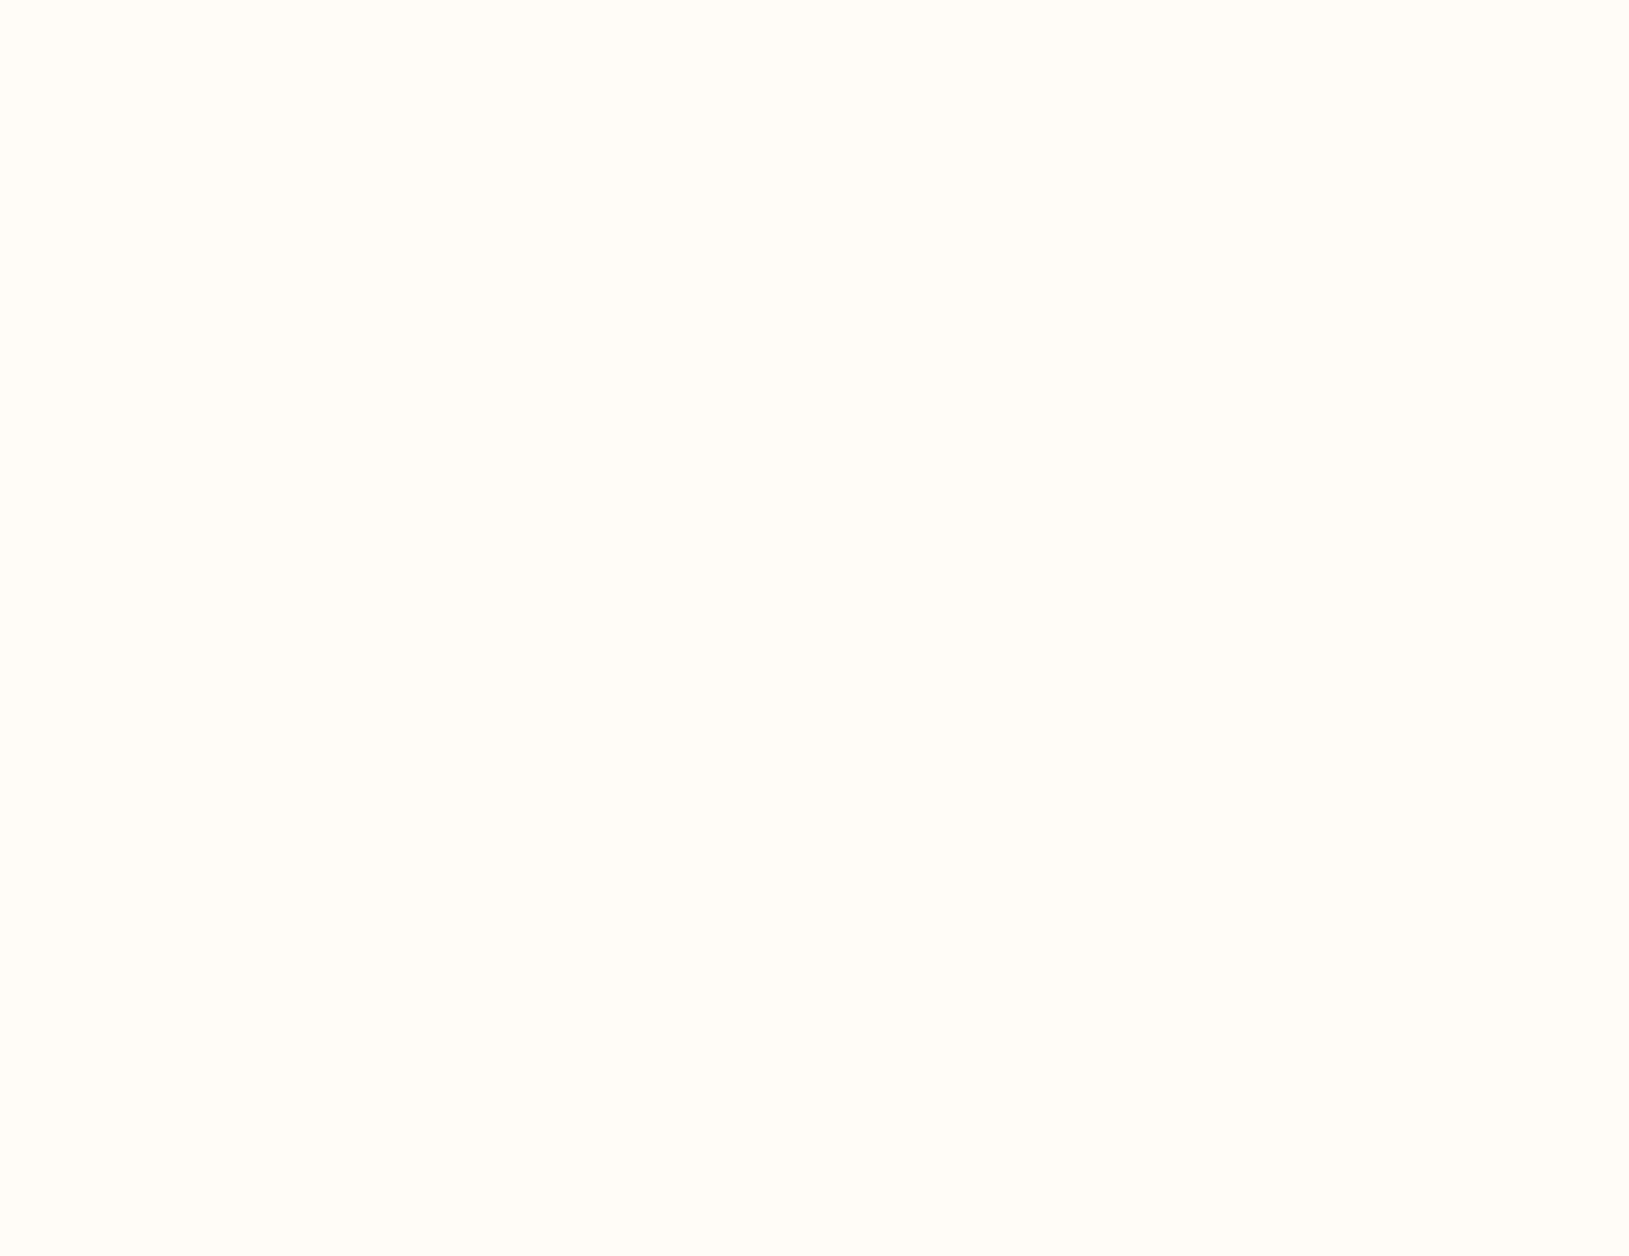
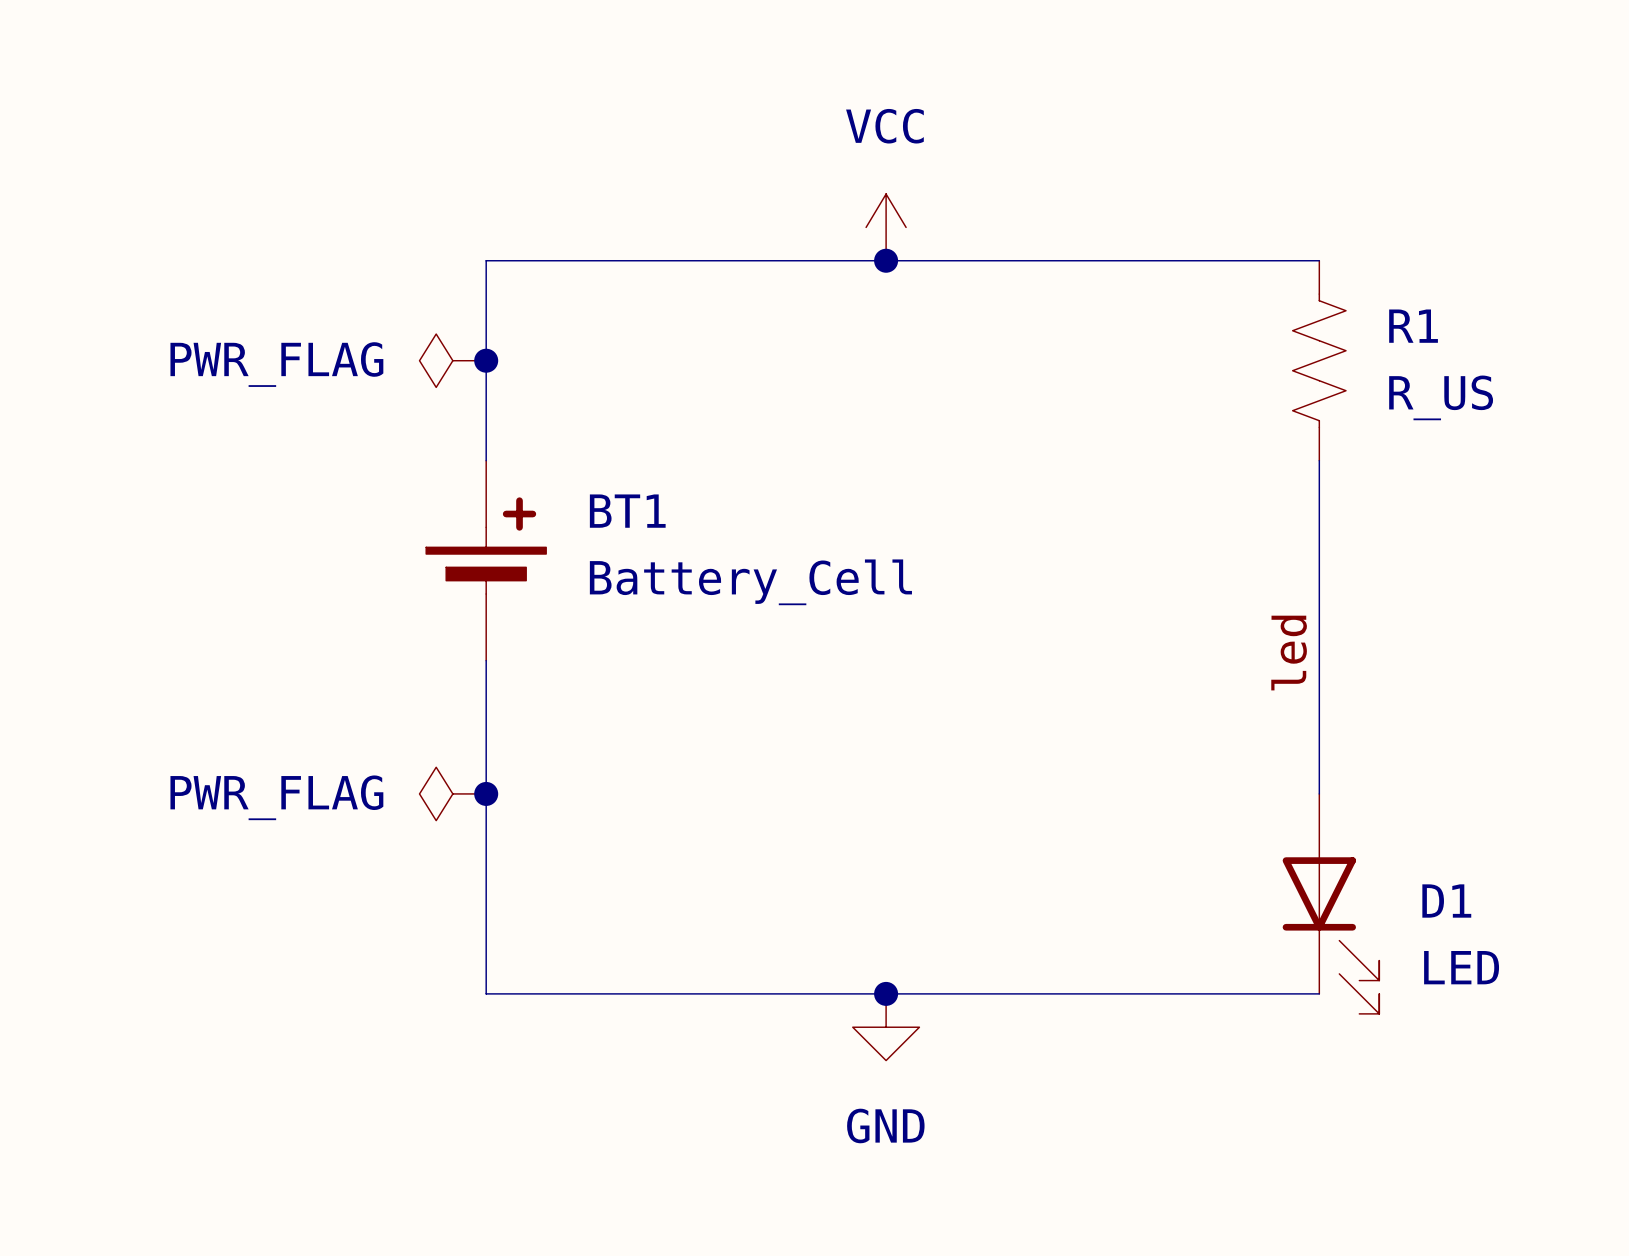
power symbol: none -> VCC (886, 227)
junction: none -> (886, 260)
wire: none -> (1319, 260) (486, 260) (486, 460)
power symbol: none -> PWR_FLAG (452, 360)
junction: none -> (486, 360)
R1: none -> R_US (1319, 360)
wire: none -> (1319, 460) (1319, 793)
BT1: none -> Battery_Cell (486, 560)
label: none -> led (1289, 653)
wire: none -> (486, 660) (486, 993) (1319, 993)
power symbol: none -> PWR_FLAG (452, 793)
junction: none -> (486, 793)
D1: none -> LED (1330, 903)
junction: none -> (886, 993)
power symbol: none -> GND (886, 1027)

